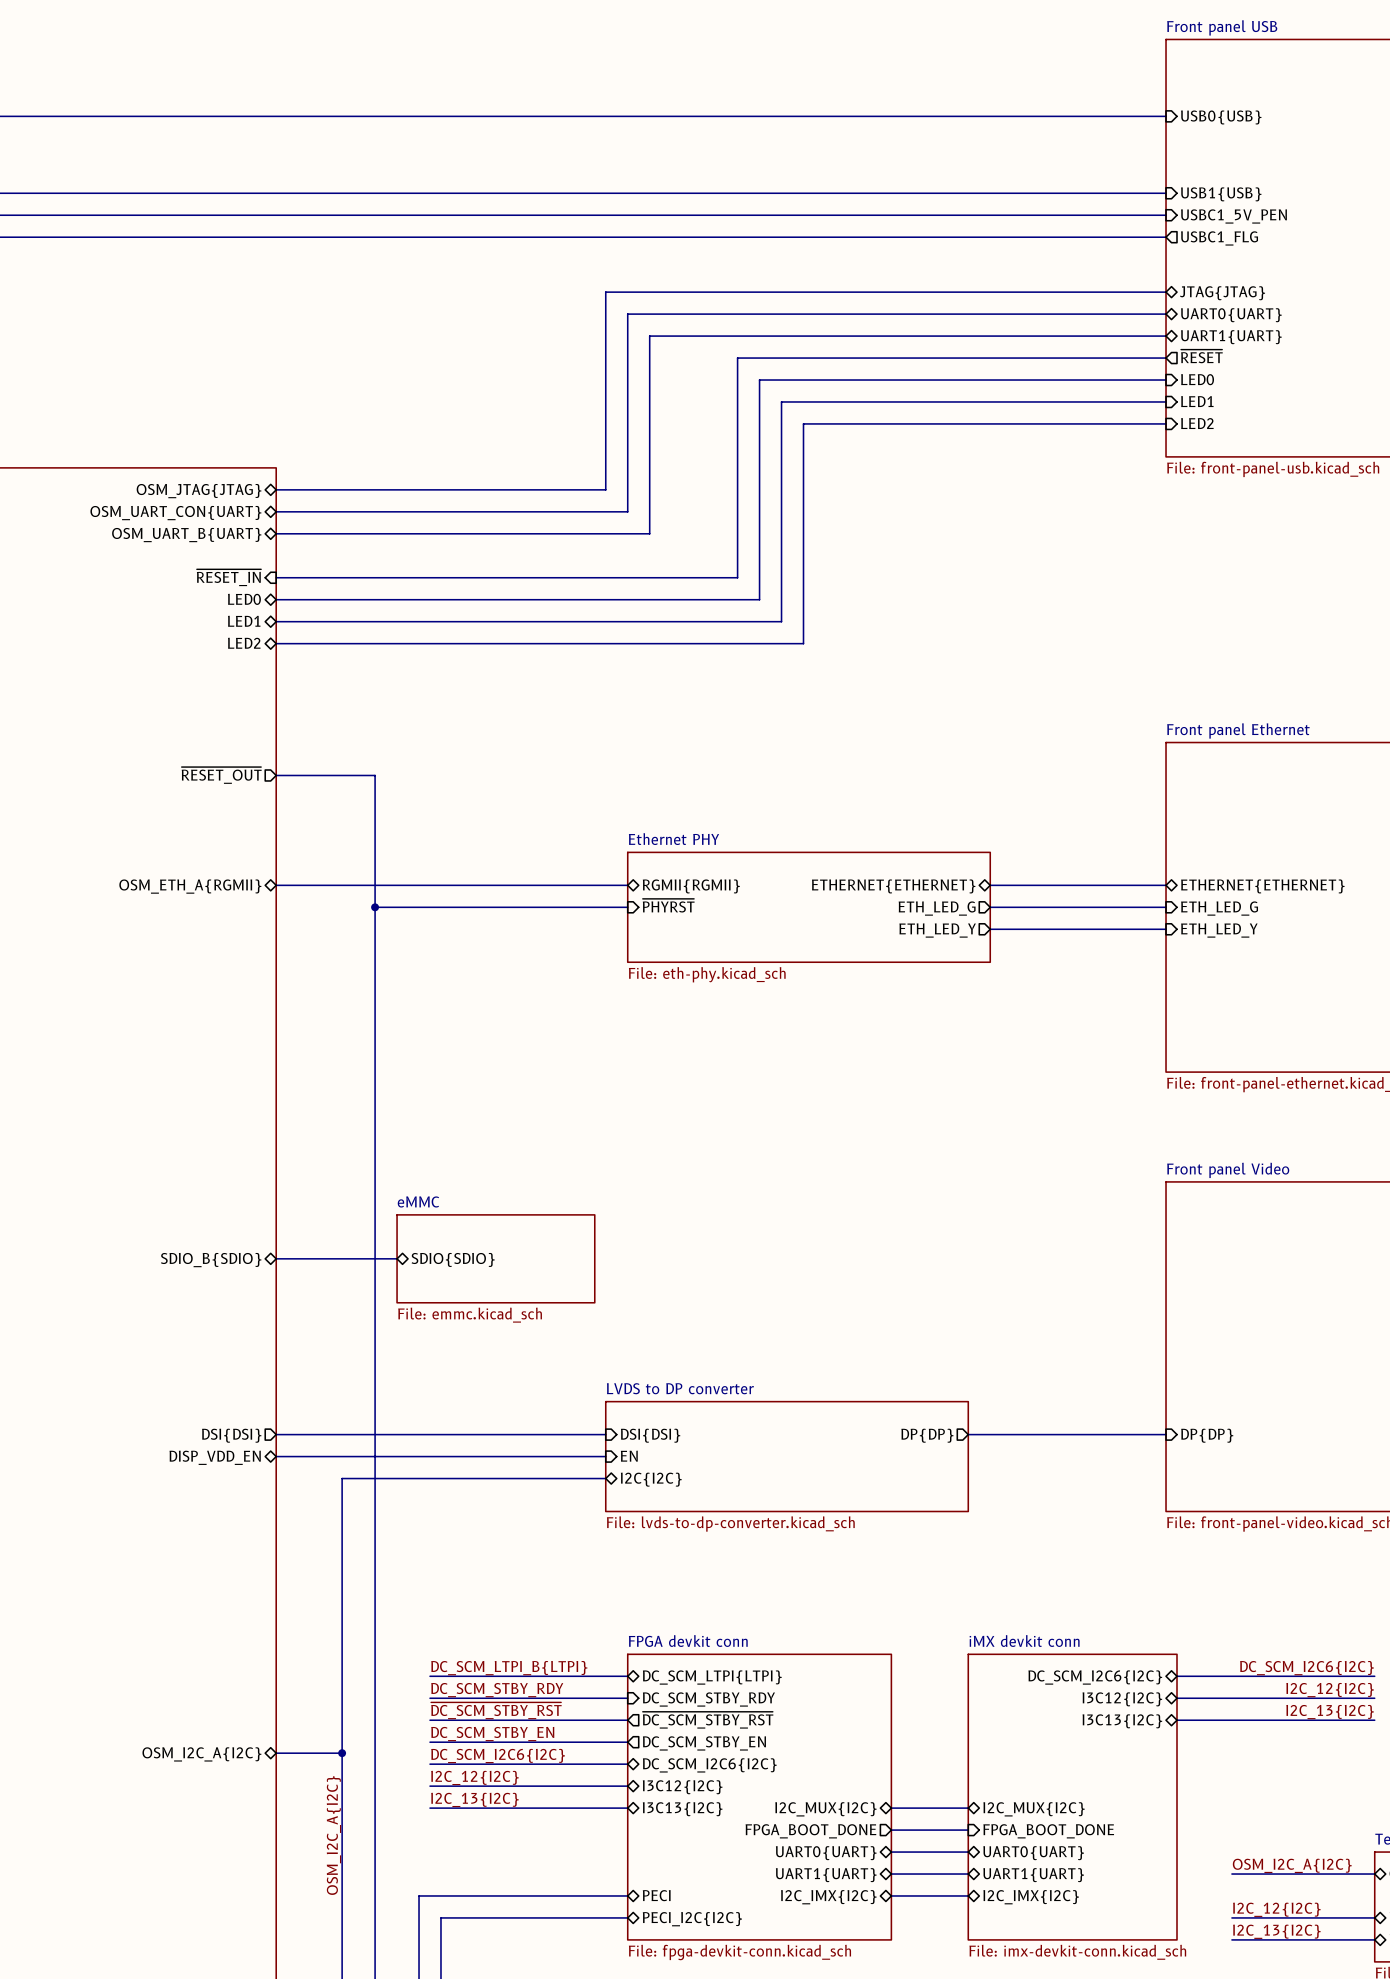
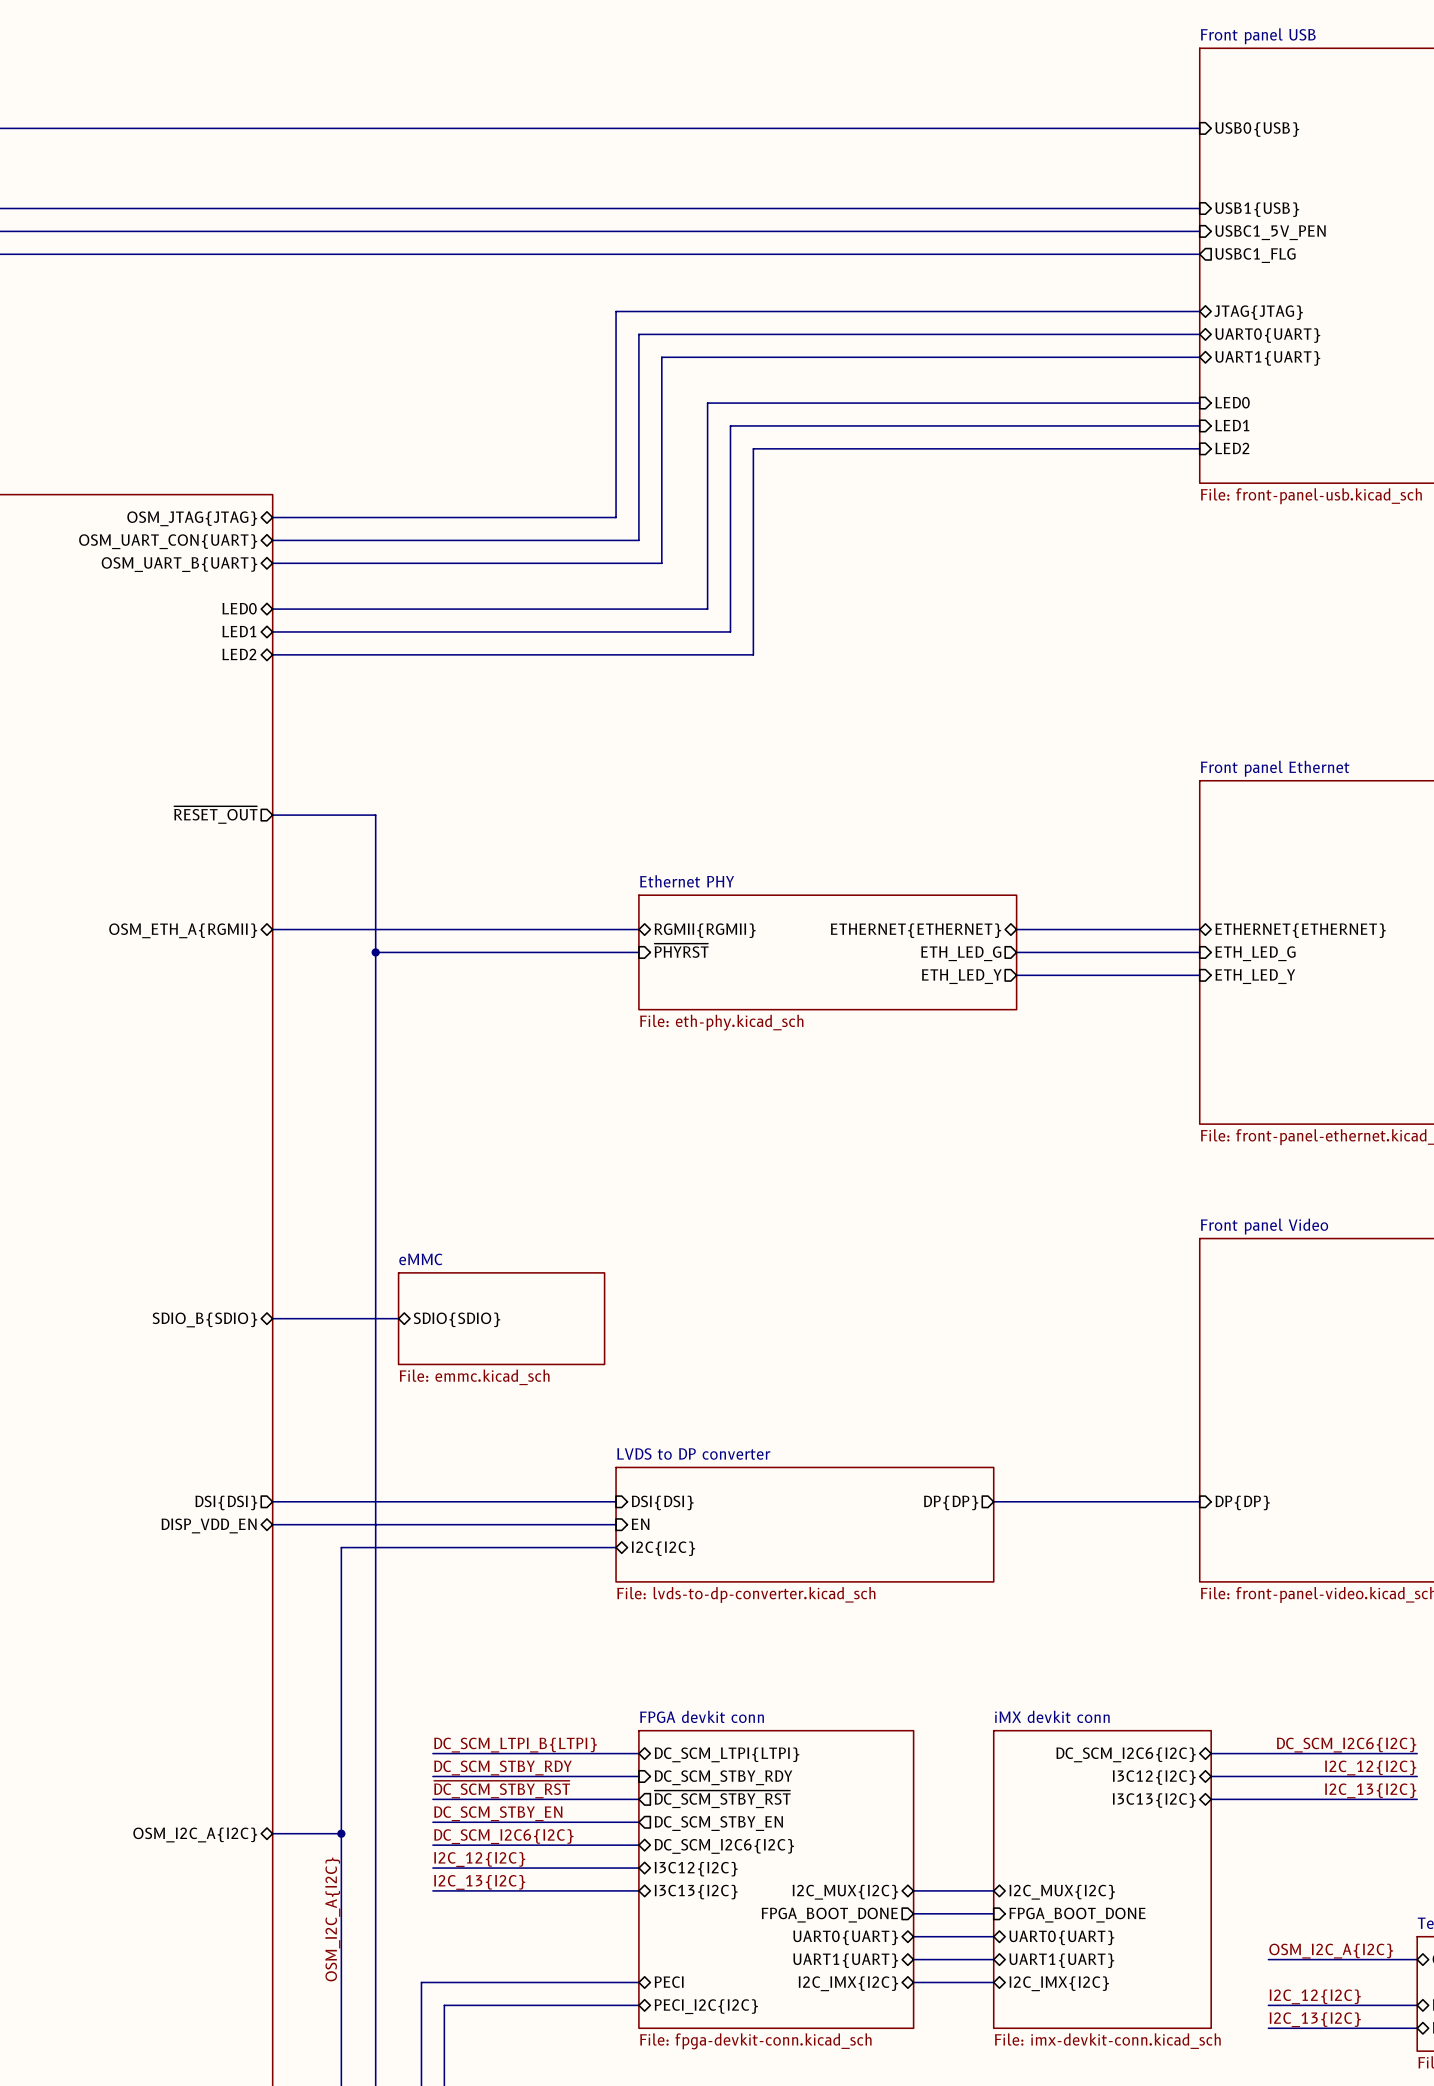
sheet pin: ~{RESET} (1201, 356) -> none
wire: (1166, 358) (737, 358) (737, 423) -> (822, 448) (753, 448)
wire: (759, 380) (759, 599) (715, 599) -> (776, 403) (707, 403) (707, 609)
wire: (781, 401) (781, 621) (737, 621) -> (799, 425) (730, 425) (730, 631)
wire: (803, 423) (803, 643) (276, 643) -> none
sheet pin shape: input (229, 577) -> bidirectional (239, 608)
sheet pin: ~{RESET_IN} (229, 577) -> LED0 (239, 608)
wire: (693, 577) (737, 577) -> (753, 654) (753, 609)
sheet pin: LED0 (244, 599) -> LED1 (239, 631)
sheet pin: LED1 (244, 621) -> LED2 (239, 654)
sheet pin: LED2 (244, 643) -> none

